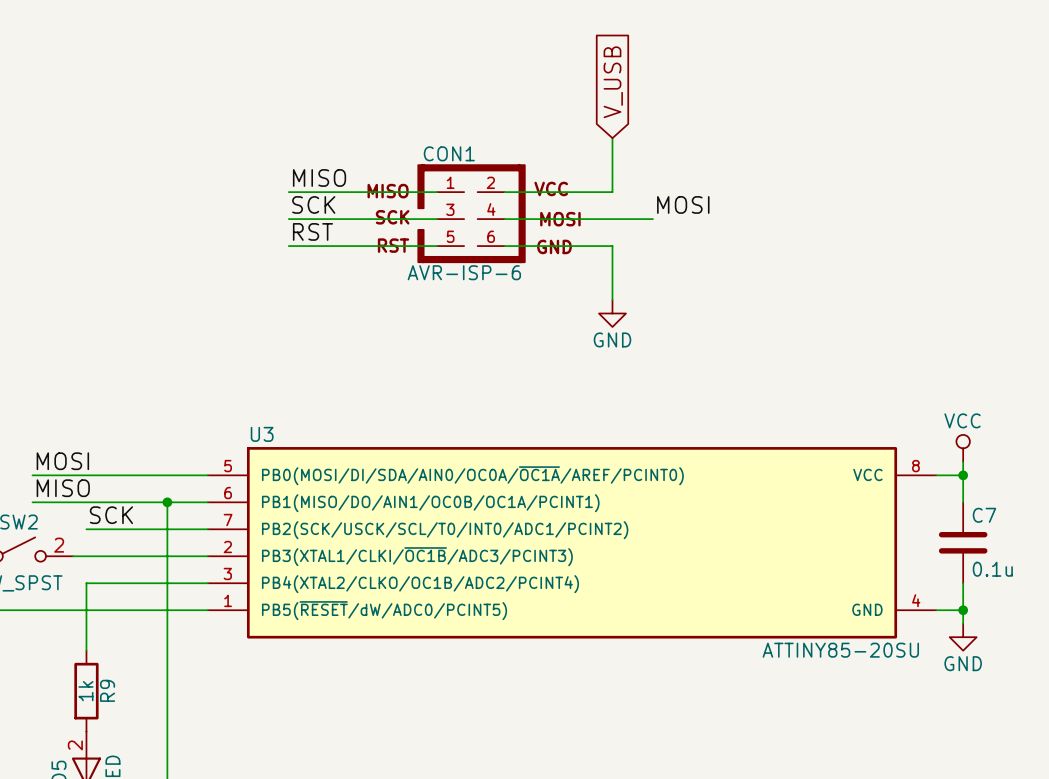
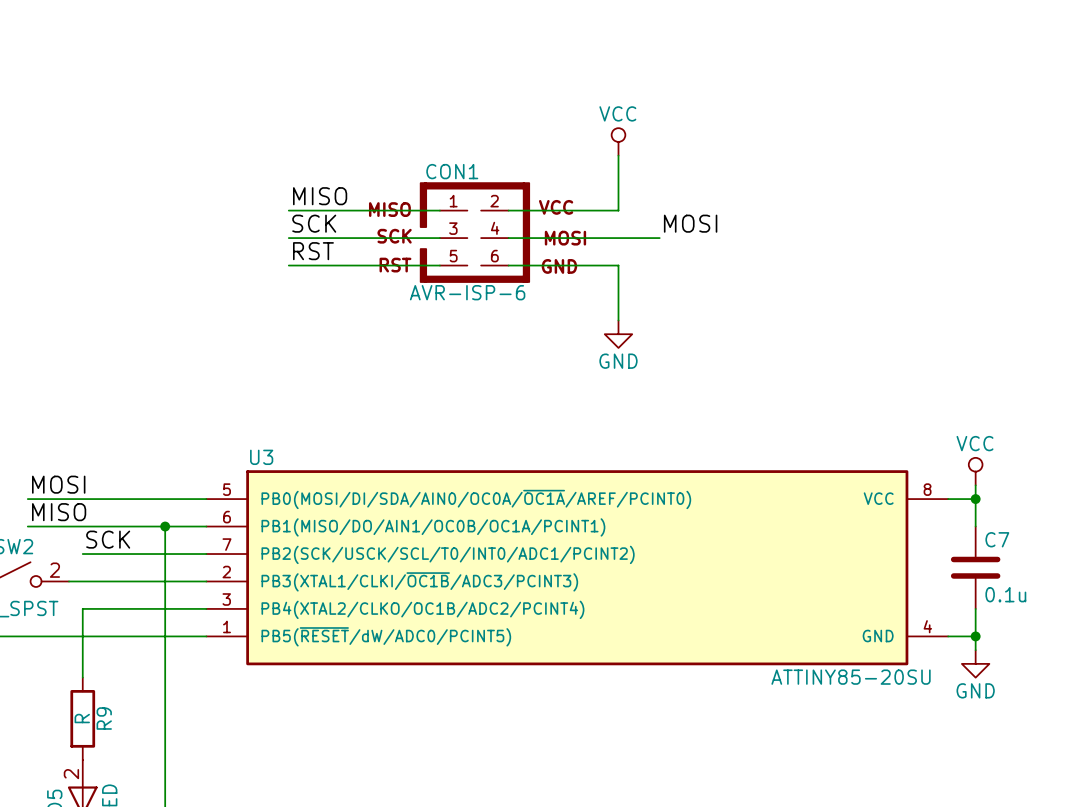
global label: V_USB (613, 82) -> none
power symbol: none -> VCC (618, 141)
R9 value: 1k (85, 691) -> R (82, 718)

